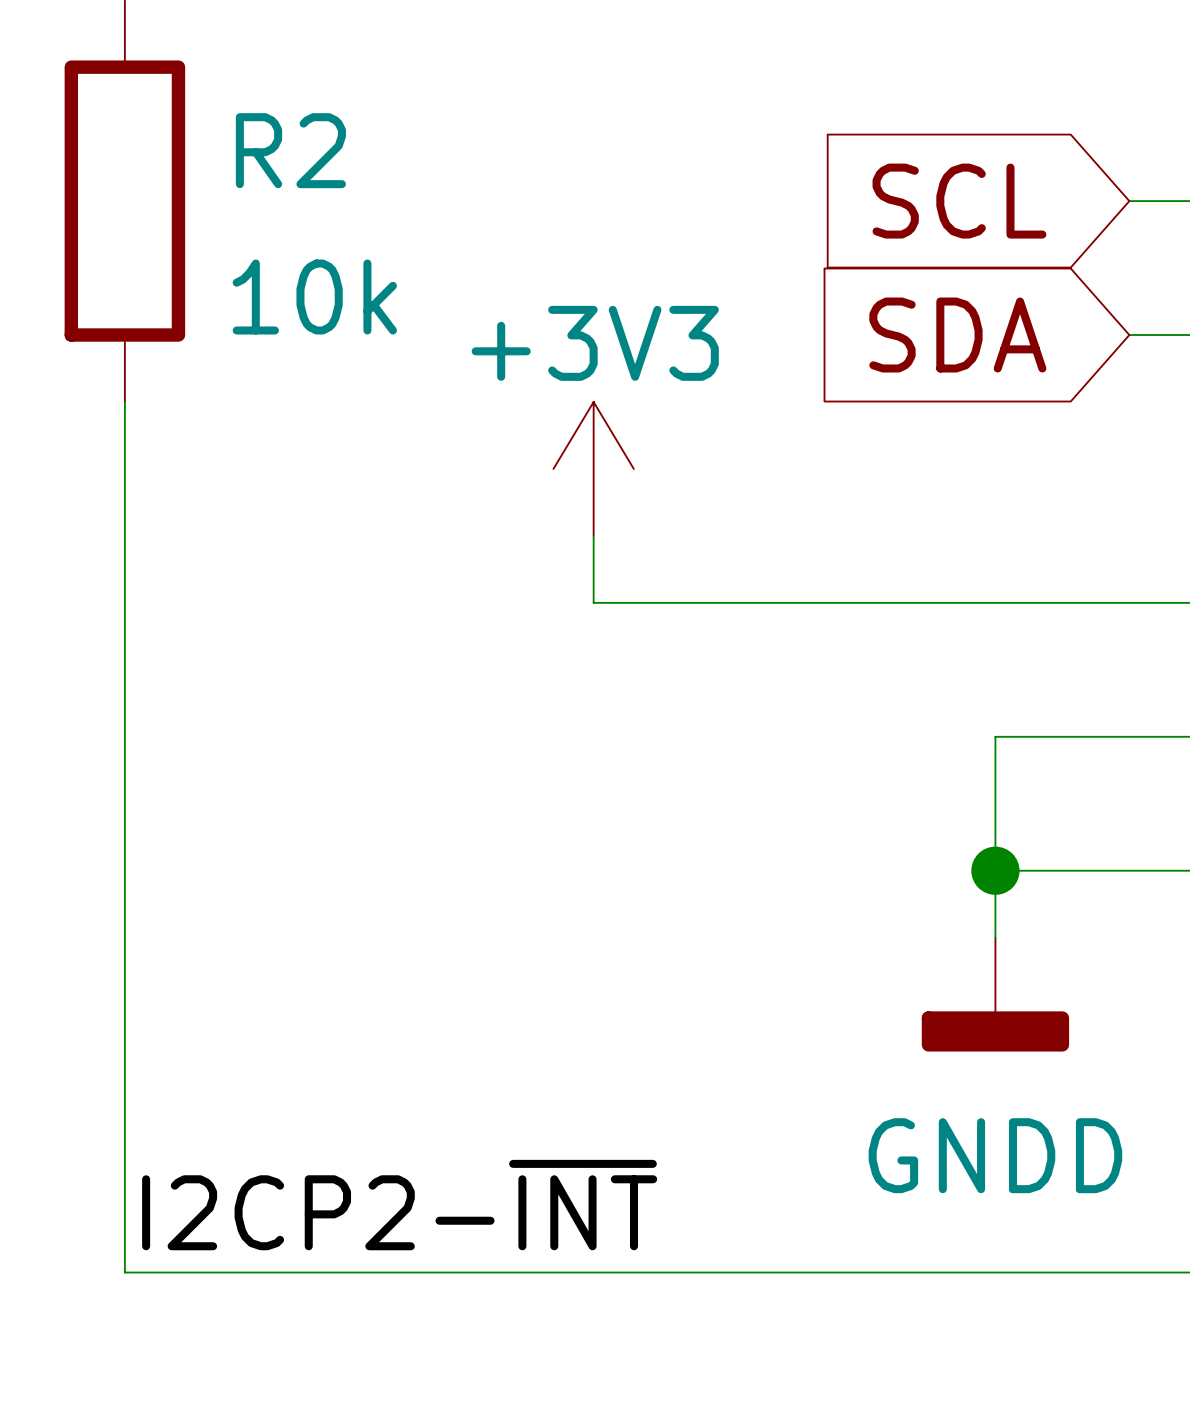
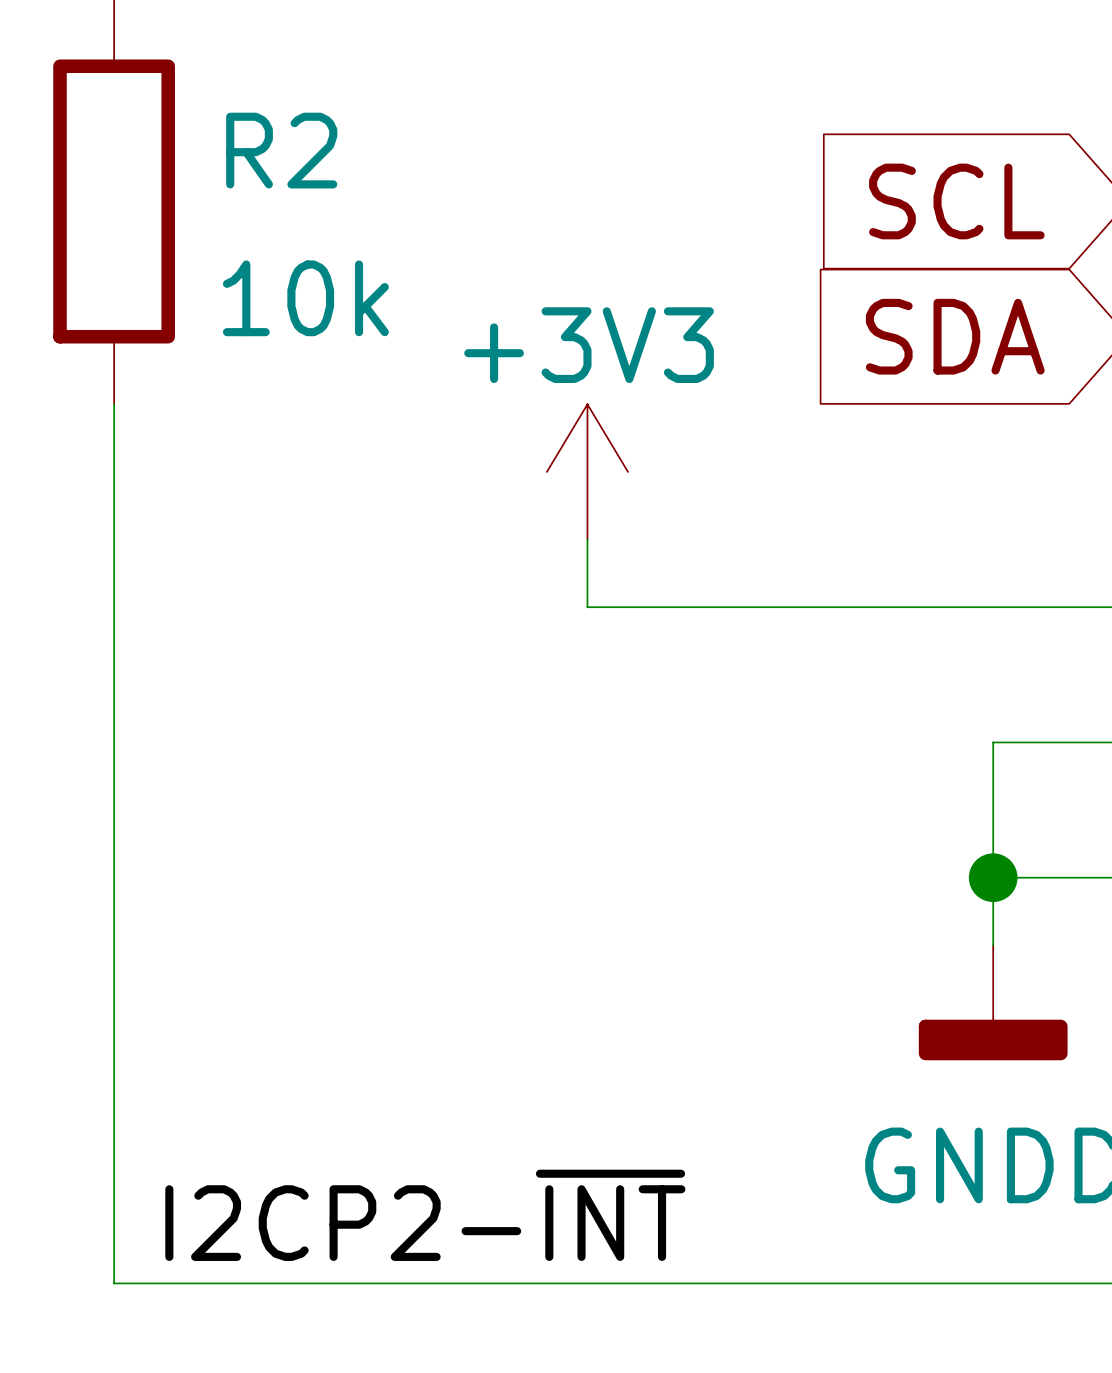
label position: I2CP2-~{INT} (399, 1205) -> I2CP2-~{INT} (425, 1215)

